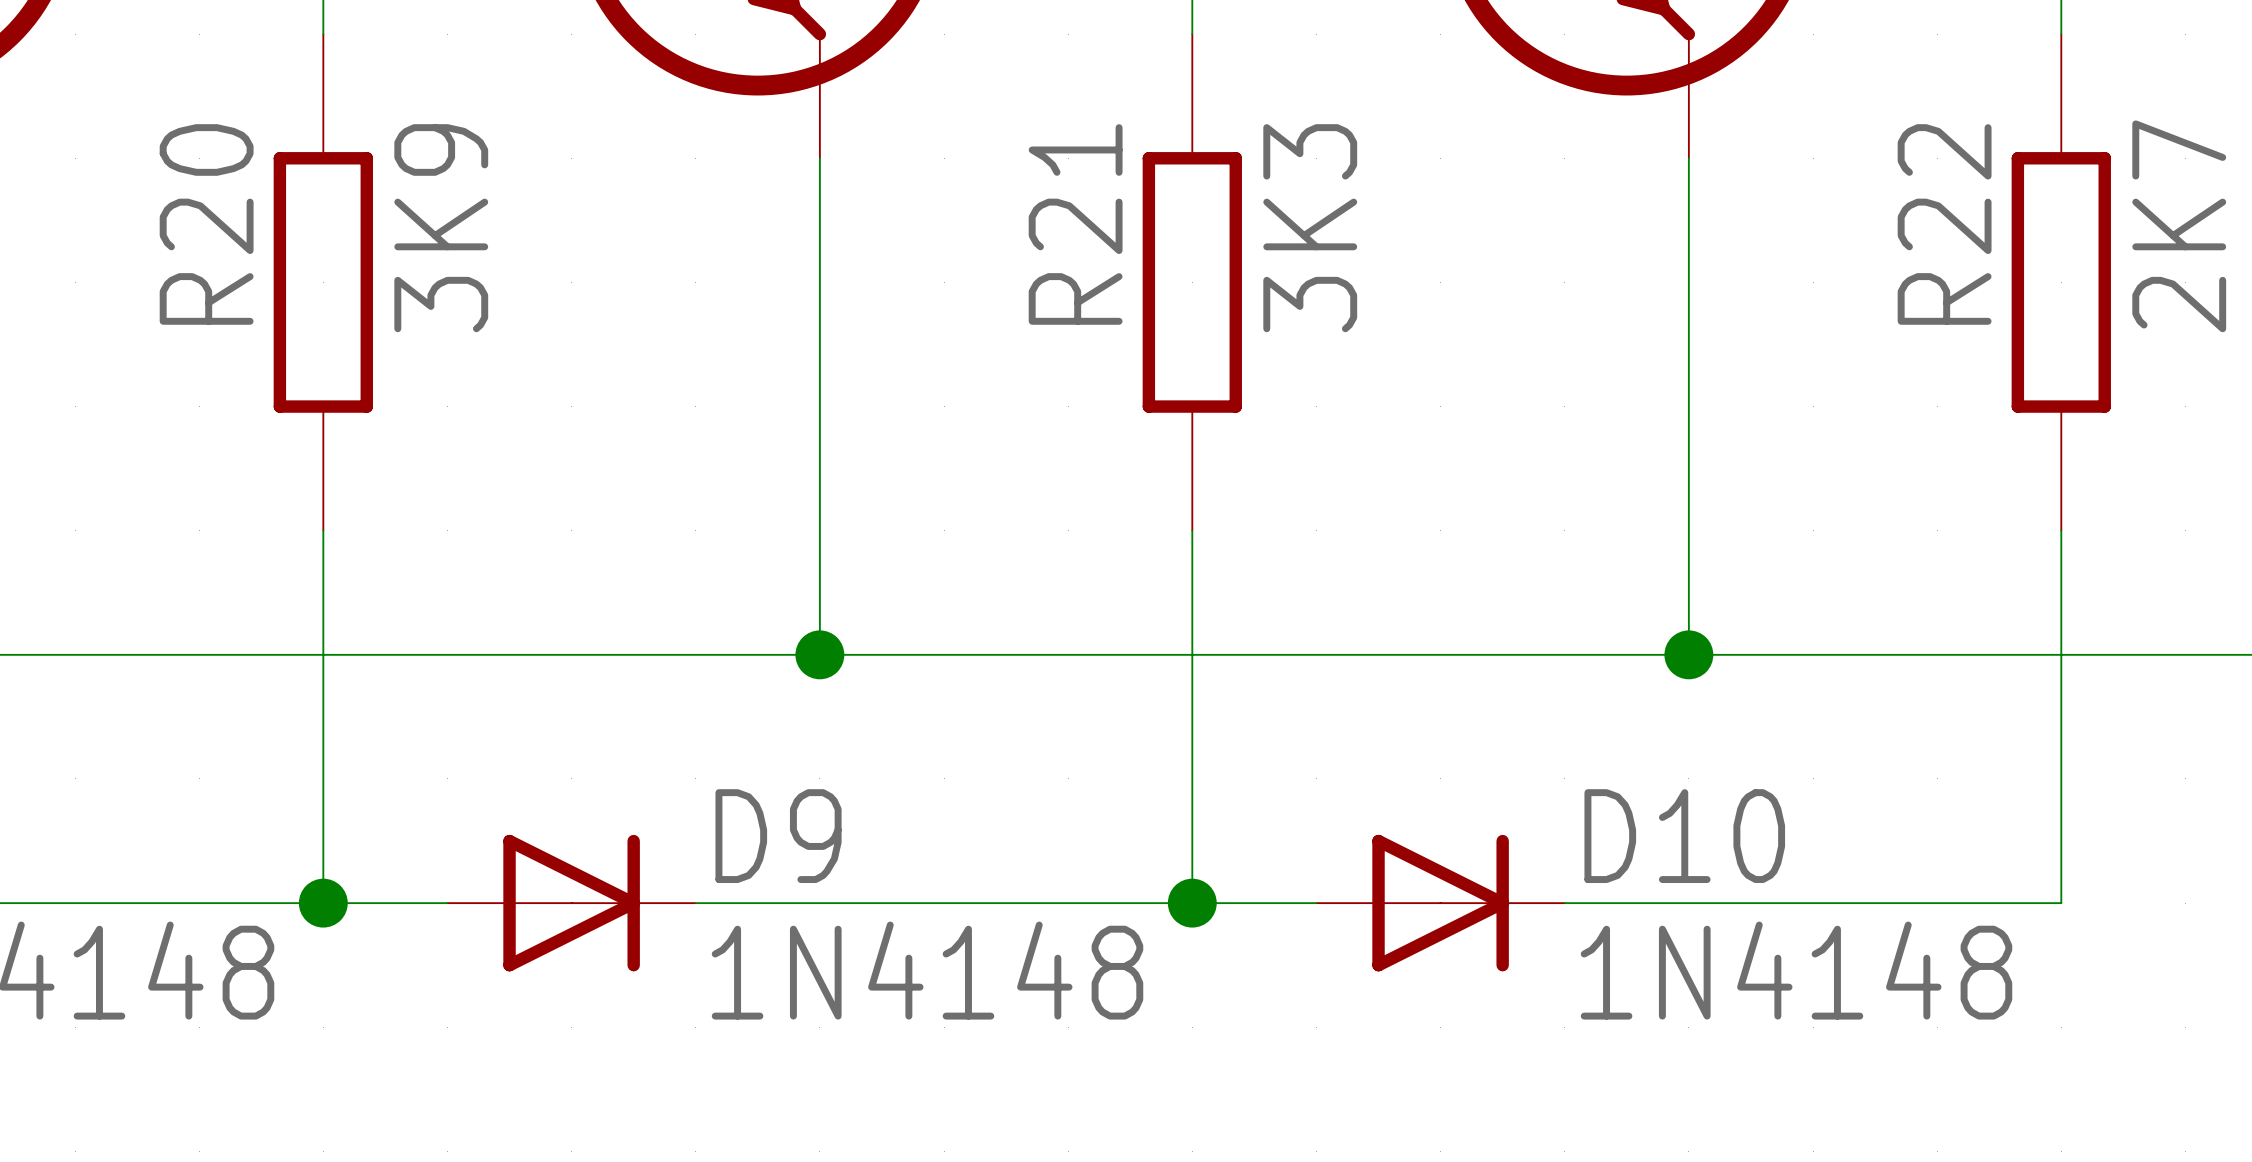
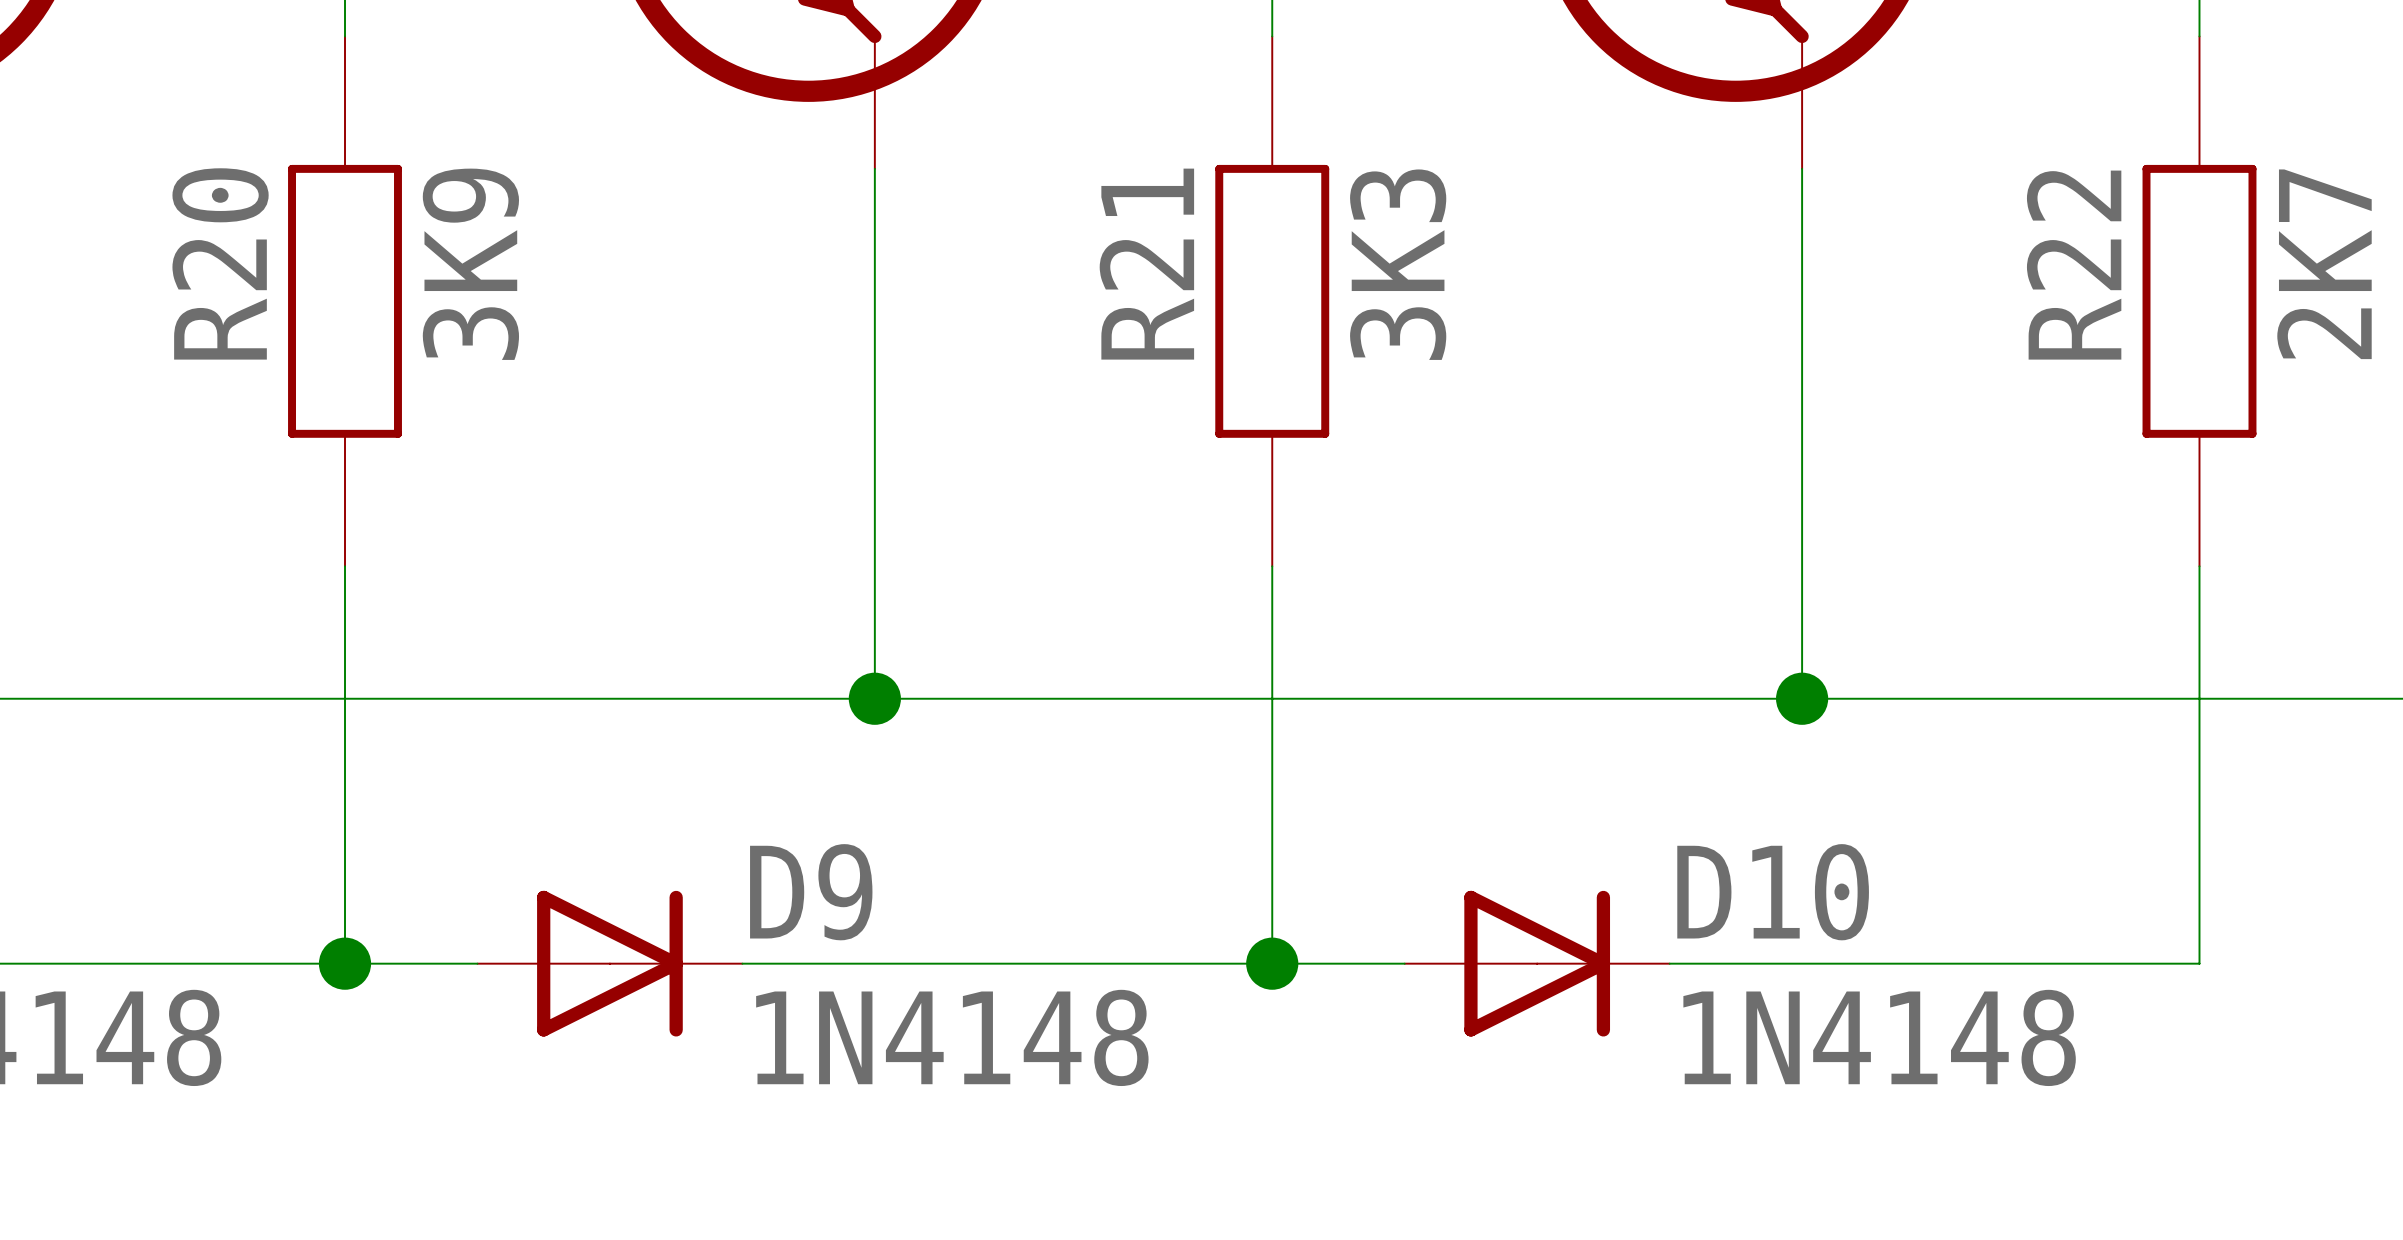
R20 symbol: [273, 34, 373, 531] -> [288, 36, 402, 567]
R21 symbol: [1142, 34, 1242, 531] -> [1215, 36, 1330, 567]
R22 symbol: [2011, 34, 2111, 531] -> [2142, 36, 2257, 567]

